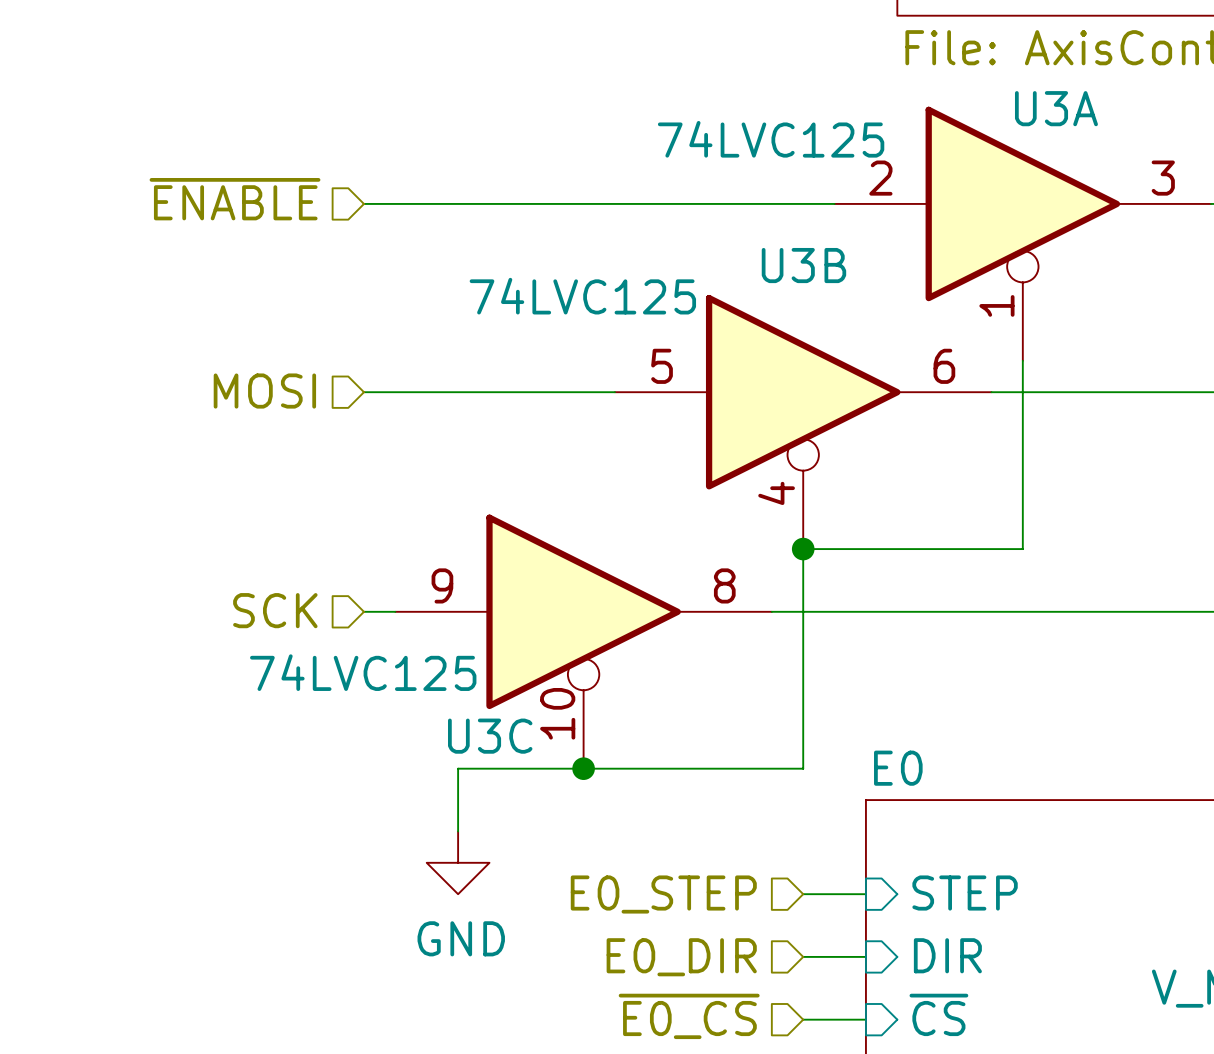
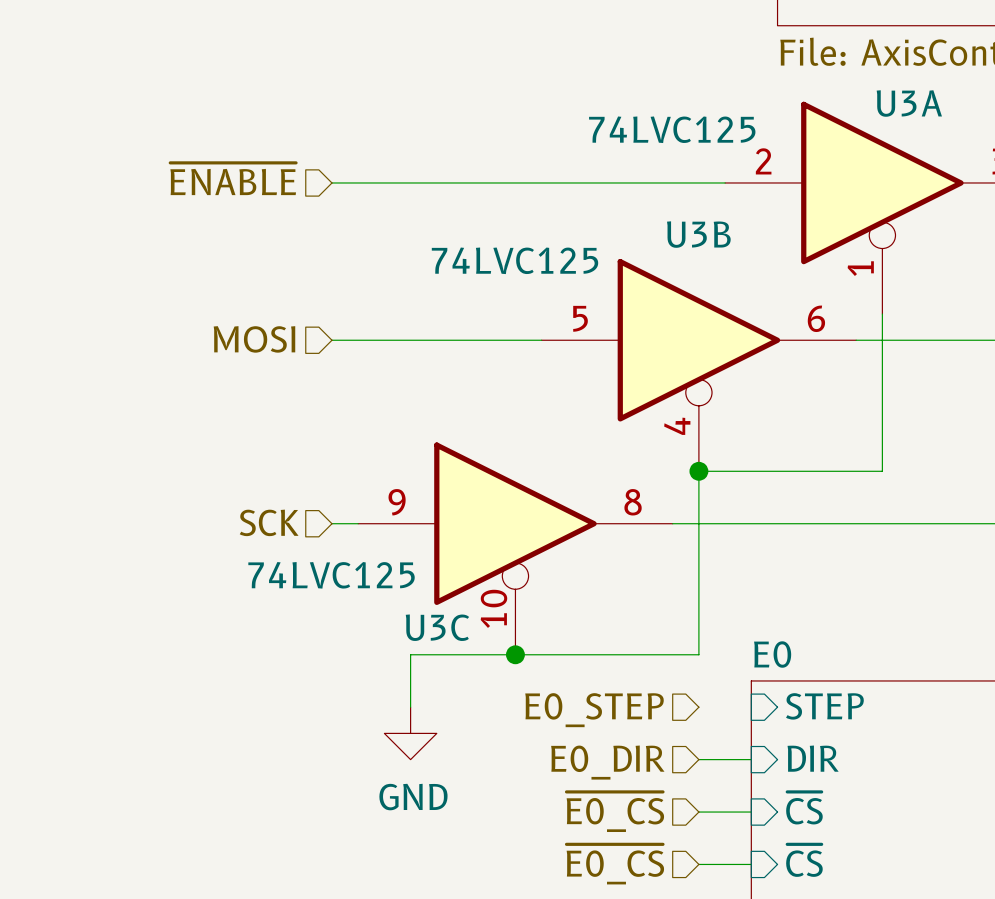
sheet pin: none -> STEP (824, 706)
hierarchical label: none -> E0_STEP (594, 710)
sheet pin: STEP (965, 893) -> DIR (813, 758)
hierarchical label: E0_STEP (663, 894) -> E0_DIR (607, 762)
sheet pin: DIR (947, 955) -> ~{CS} (804, 808)
hierarchical label: E0_DIR (681, 957) -> ~{E0_CS} (615, 811)

